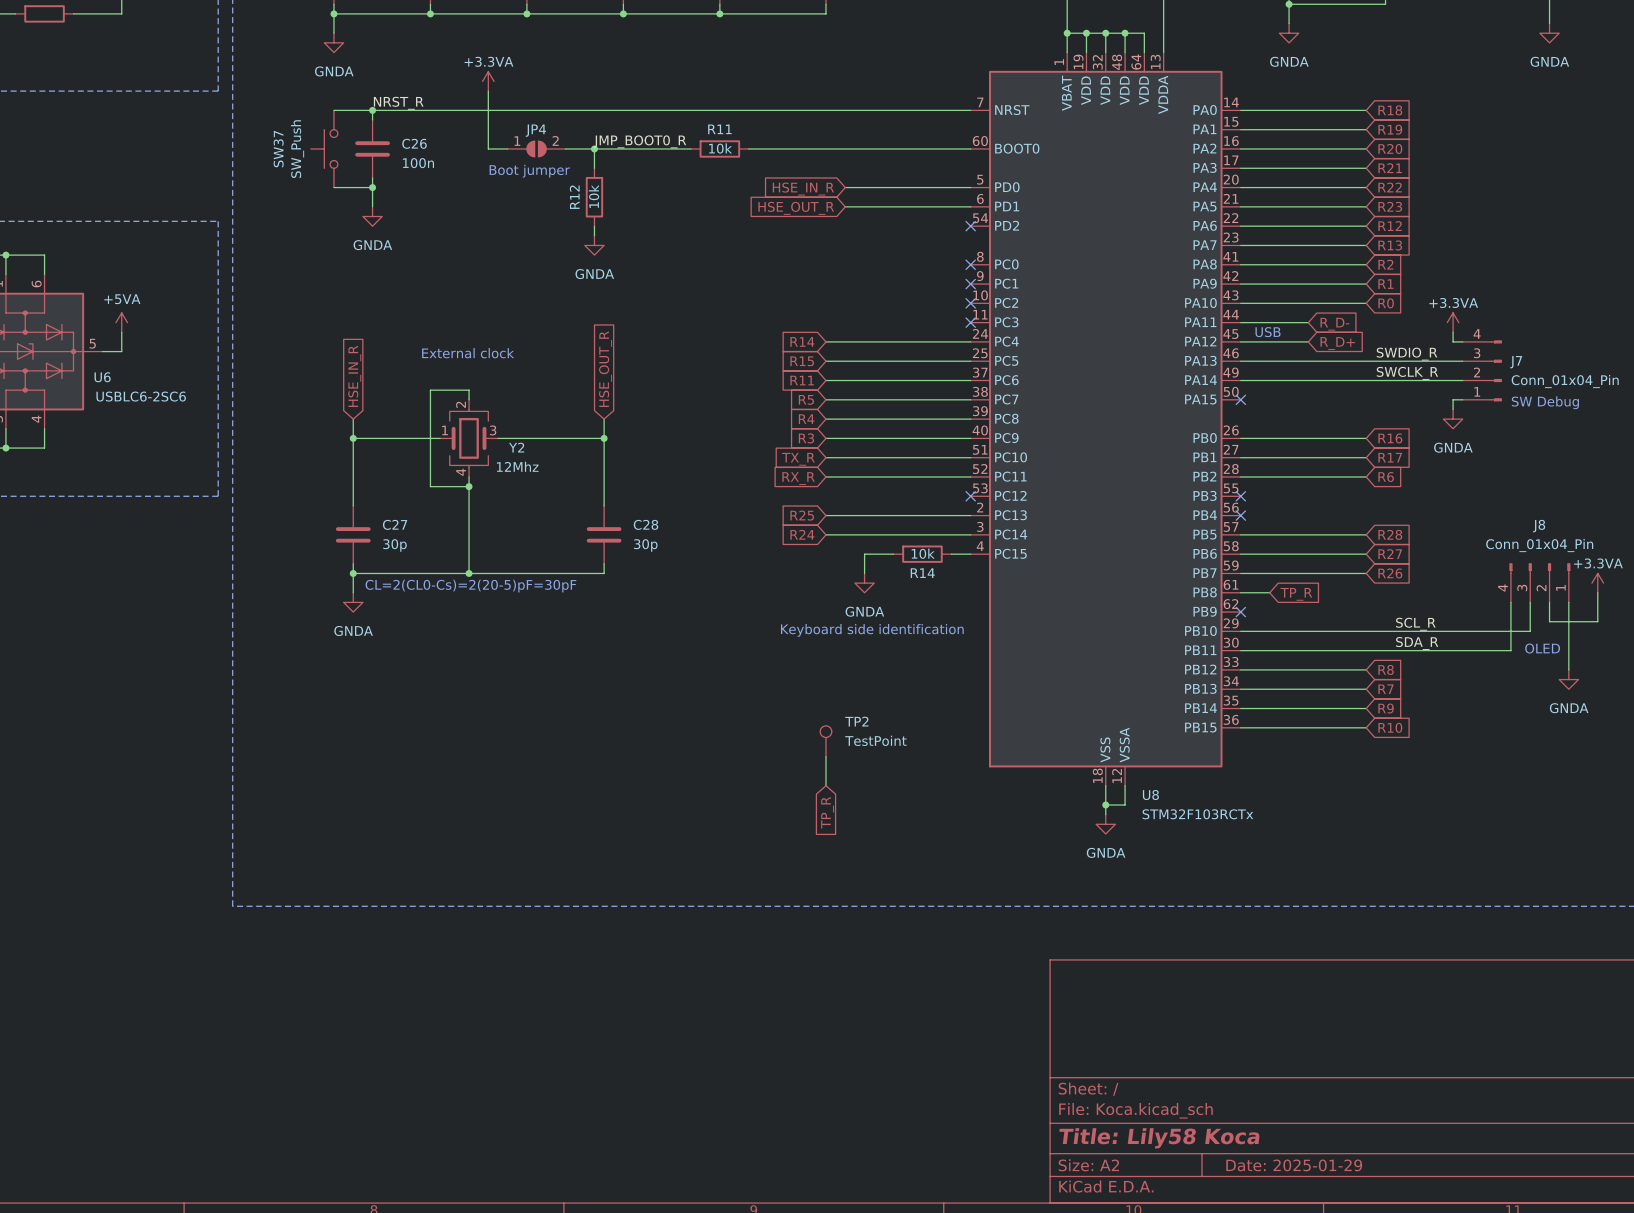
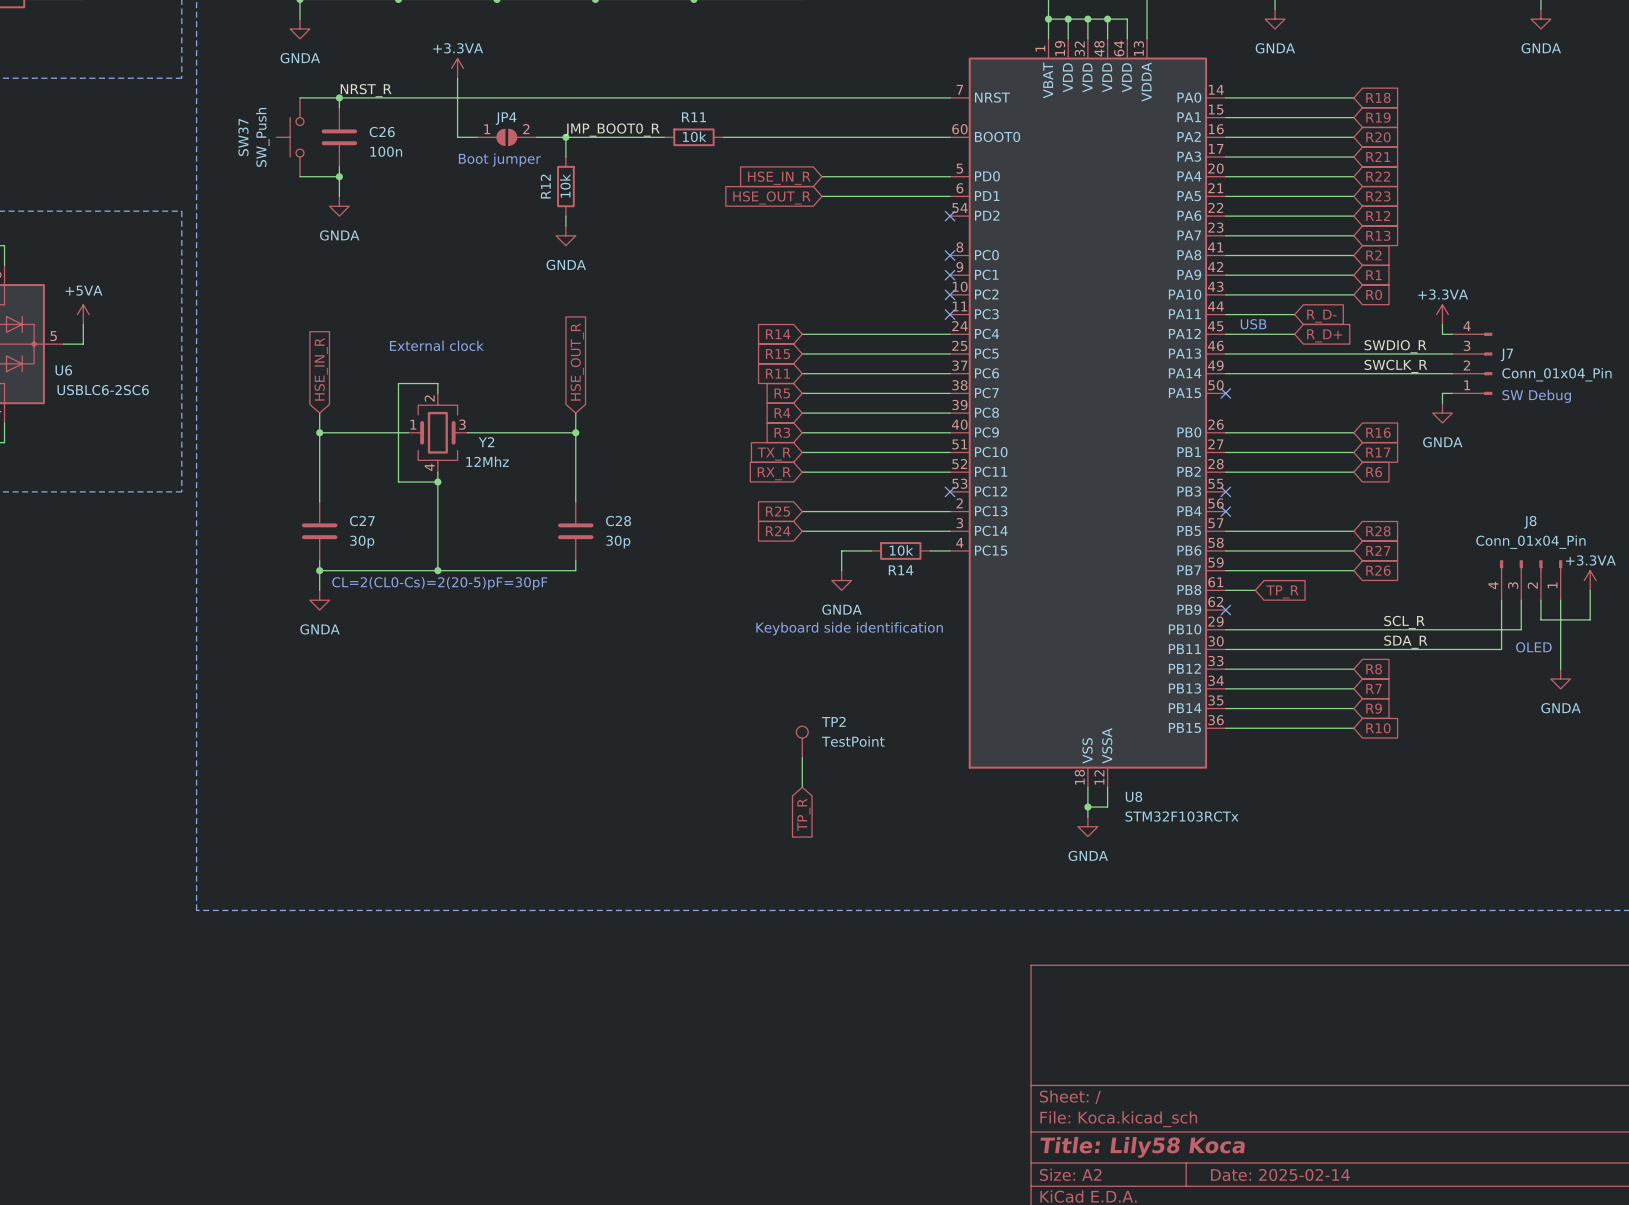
title block: Date: 2025-01-29 (1294, 1165) -> Date: 2025-02-14 (1280, 1174)

